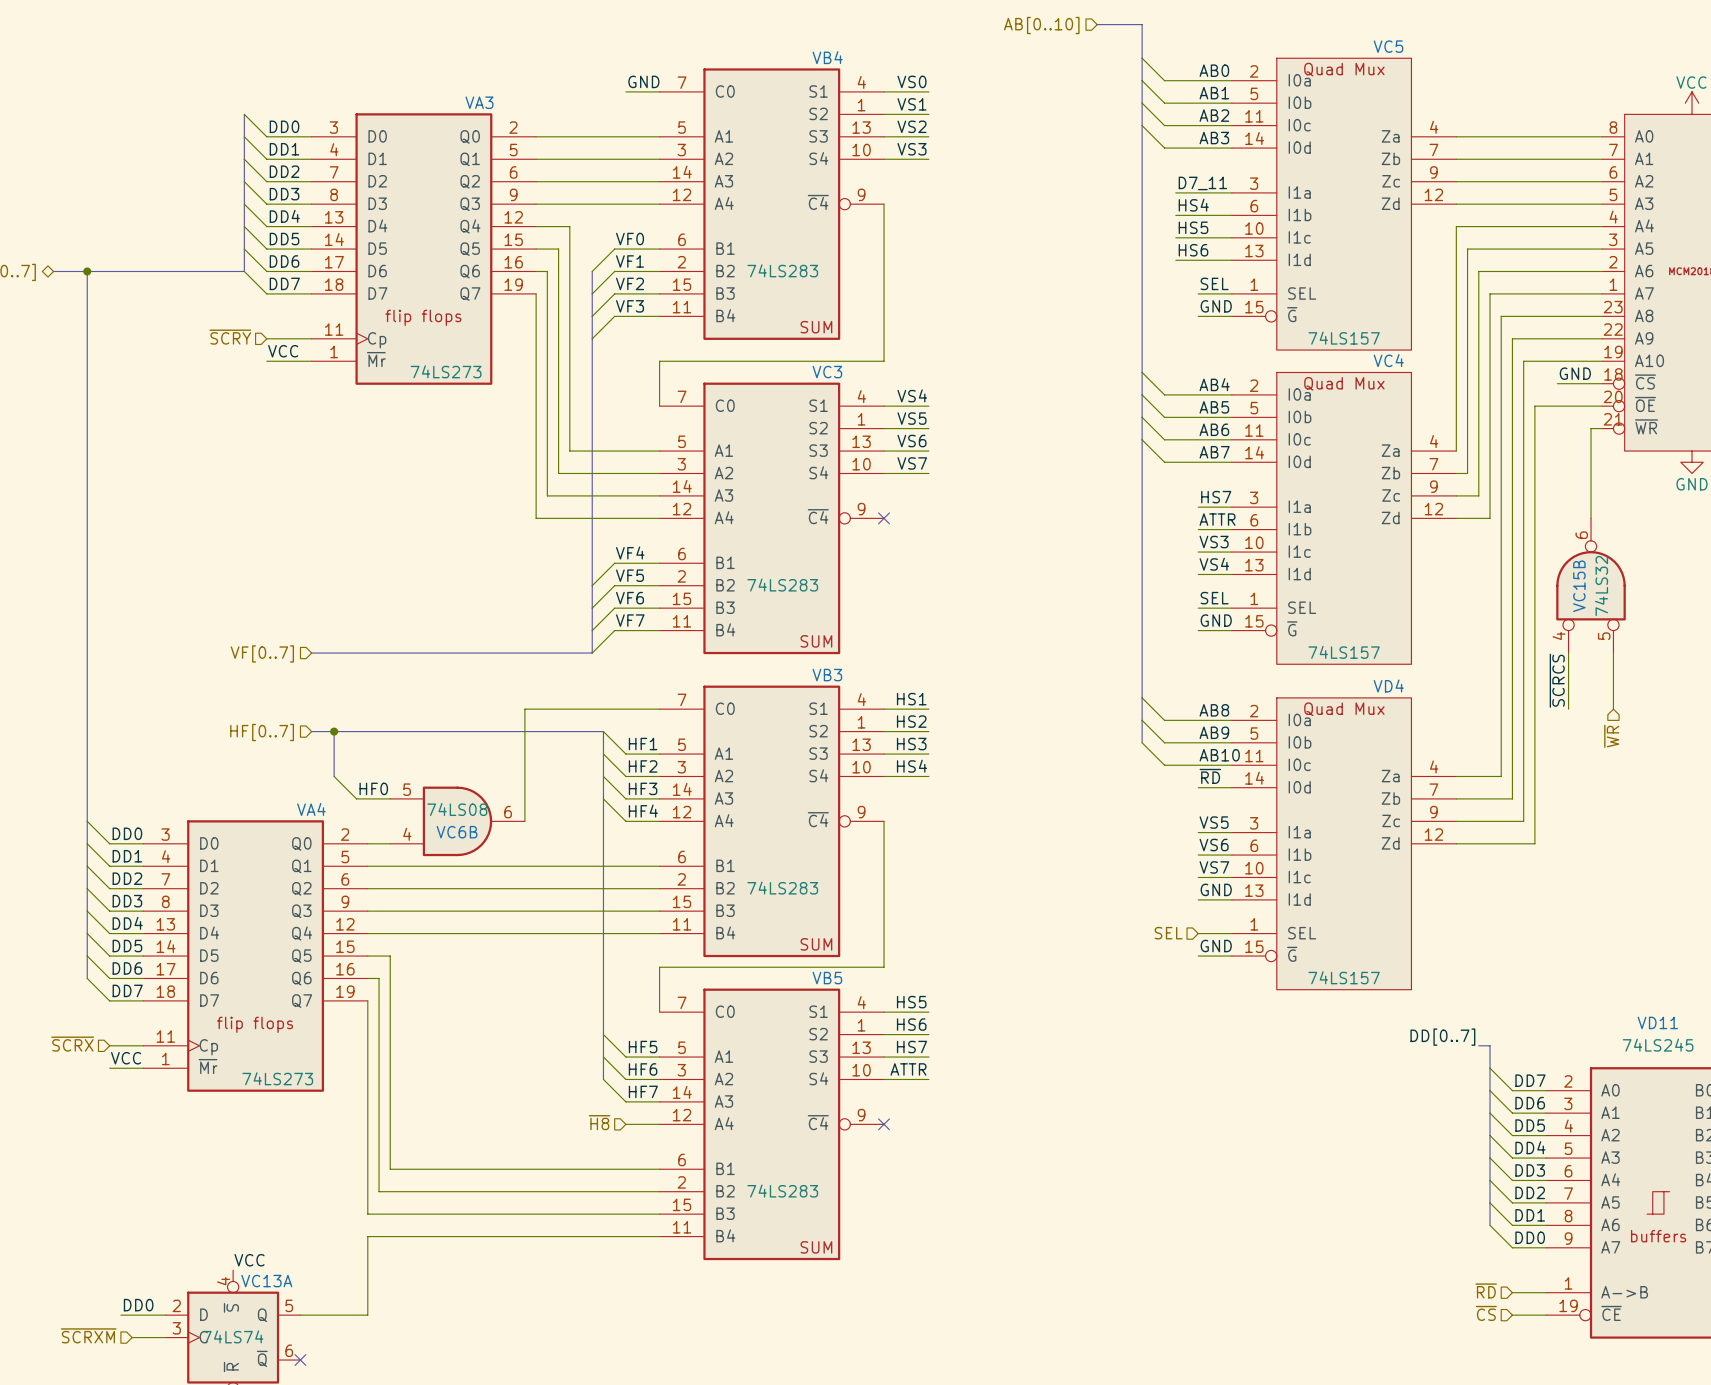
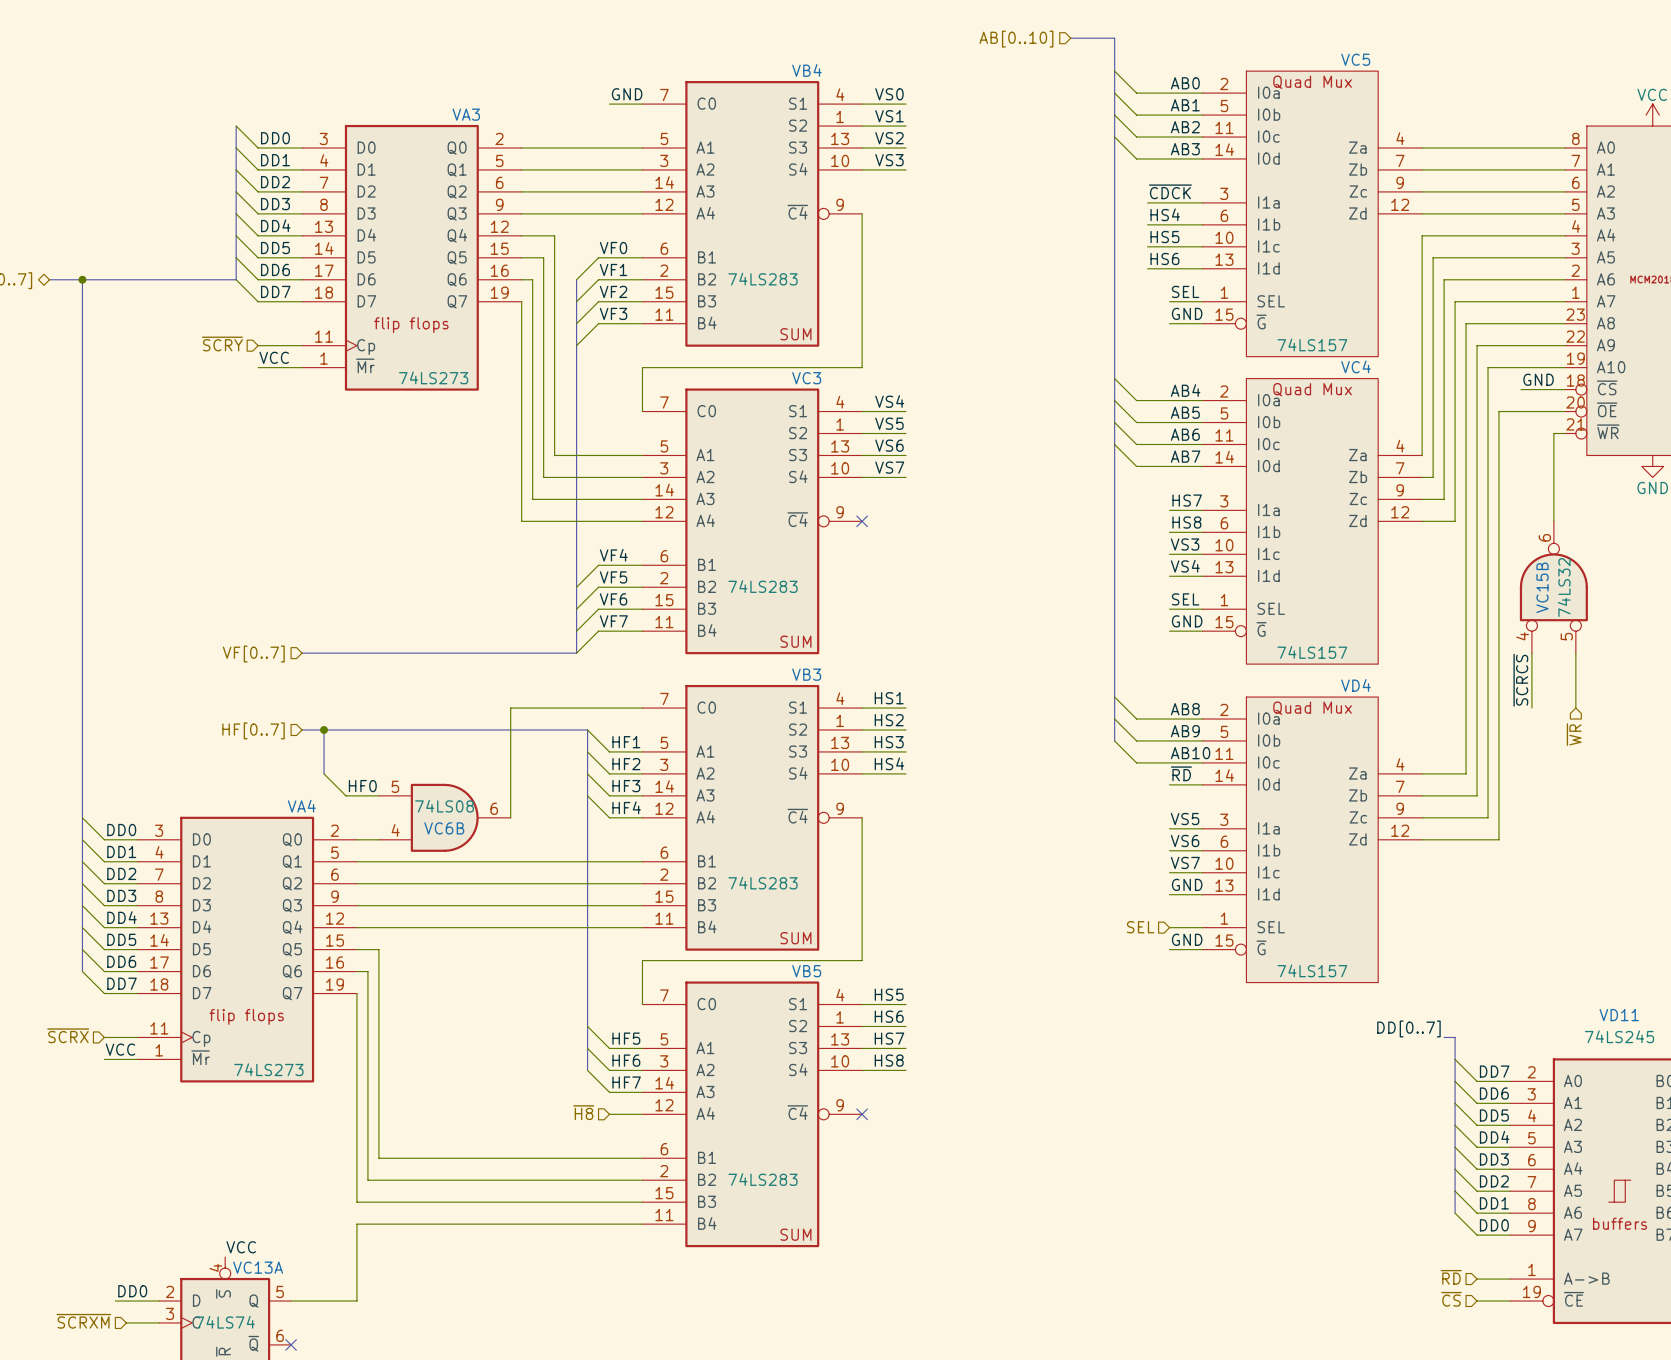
label: D7_11 (1202, 183) -> ~{CDCK} (1170, 191)
label: ATTR (1217, 519) -> HS8 (1186, 522)
label: ATTR (908, 1069) -> HS8 (889, 1060)

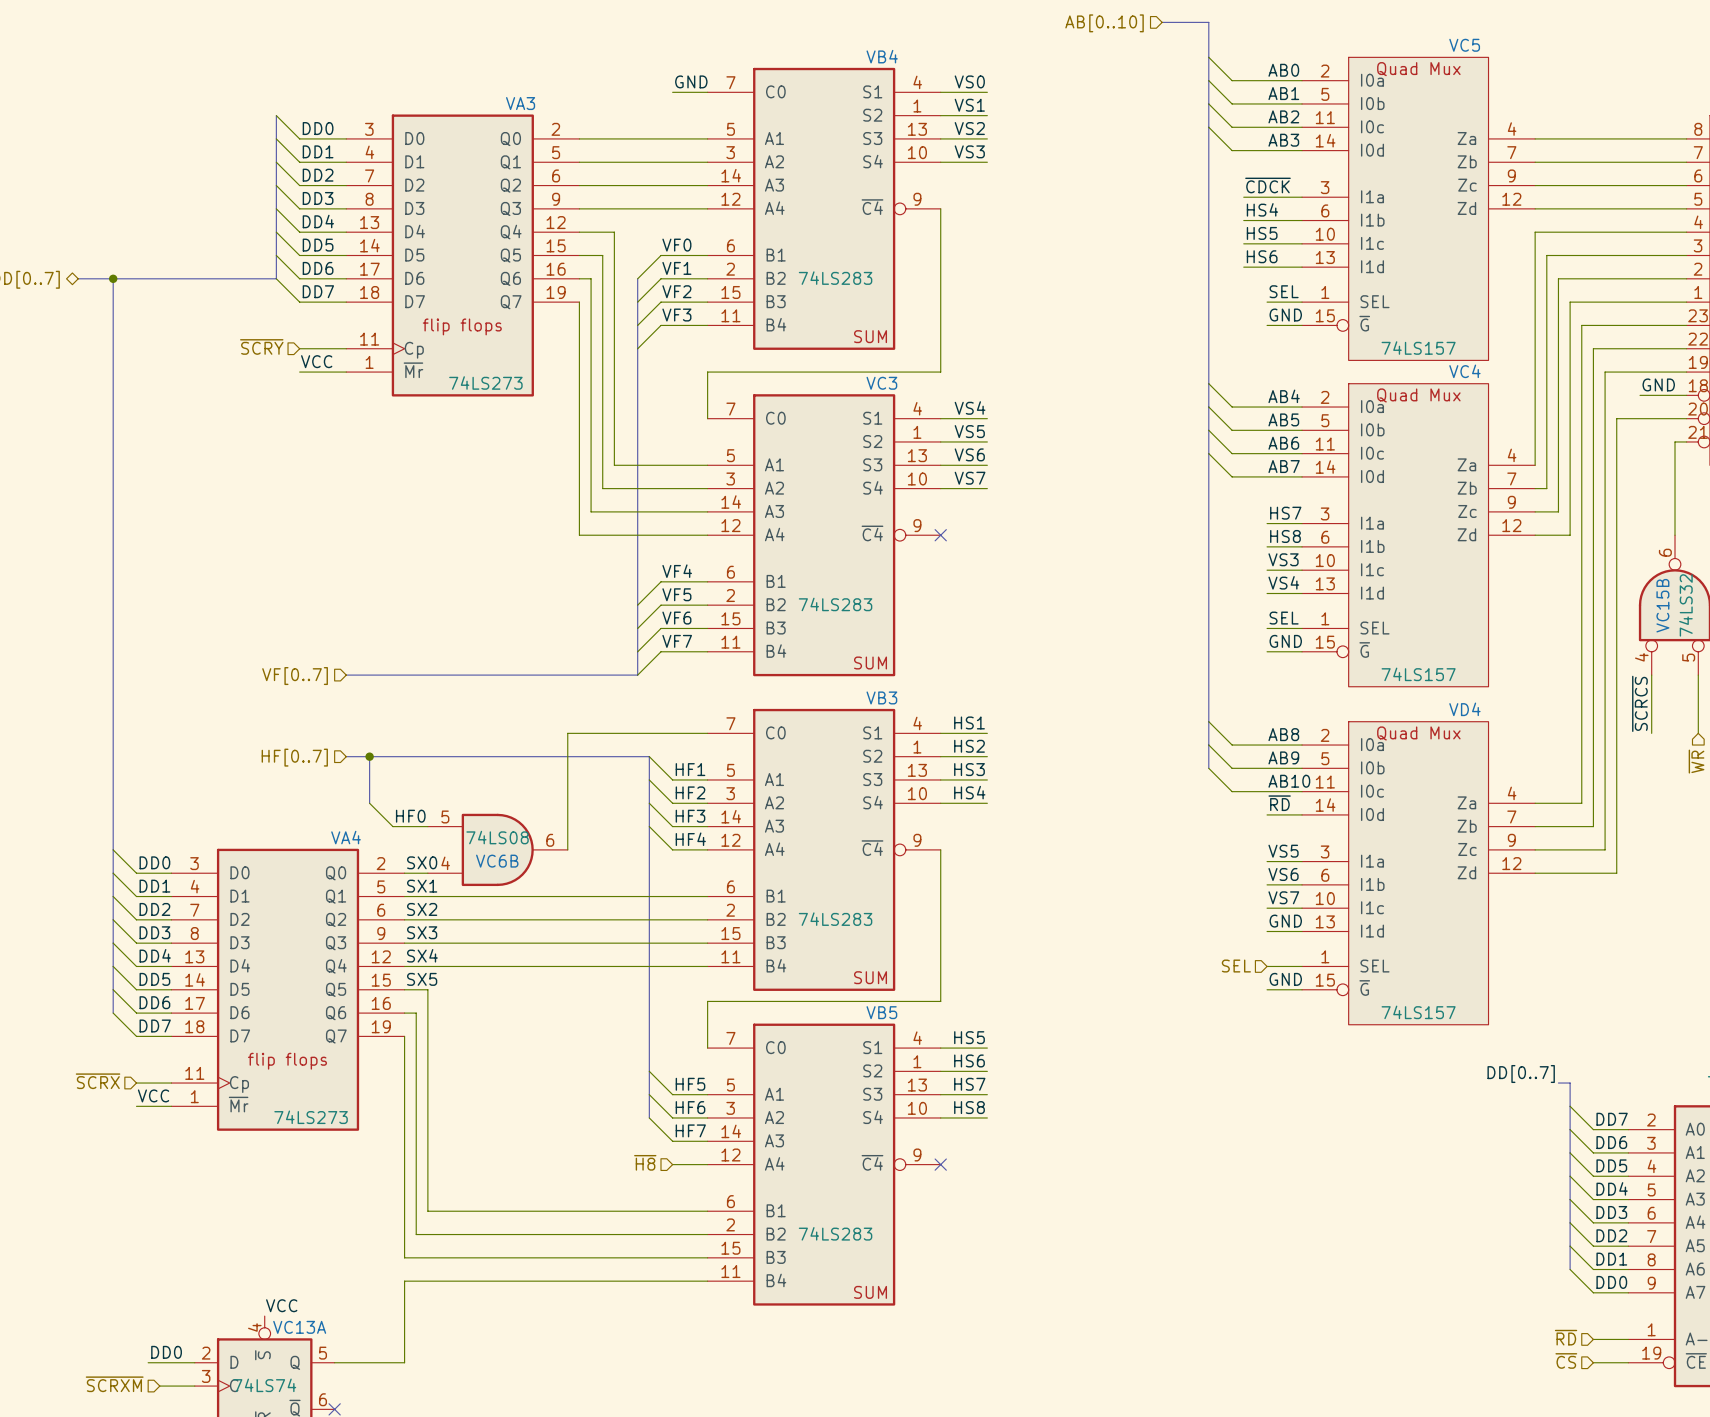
label: none -> SX0 (422, 862)
label: none -> SX1 (422, 886)
label: none -> SX2 (422, 909)
label: none -> SX3 (422, 932)
label: none -> SX4 (422, 955)
label: none -> SX5 (422, 979)

